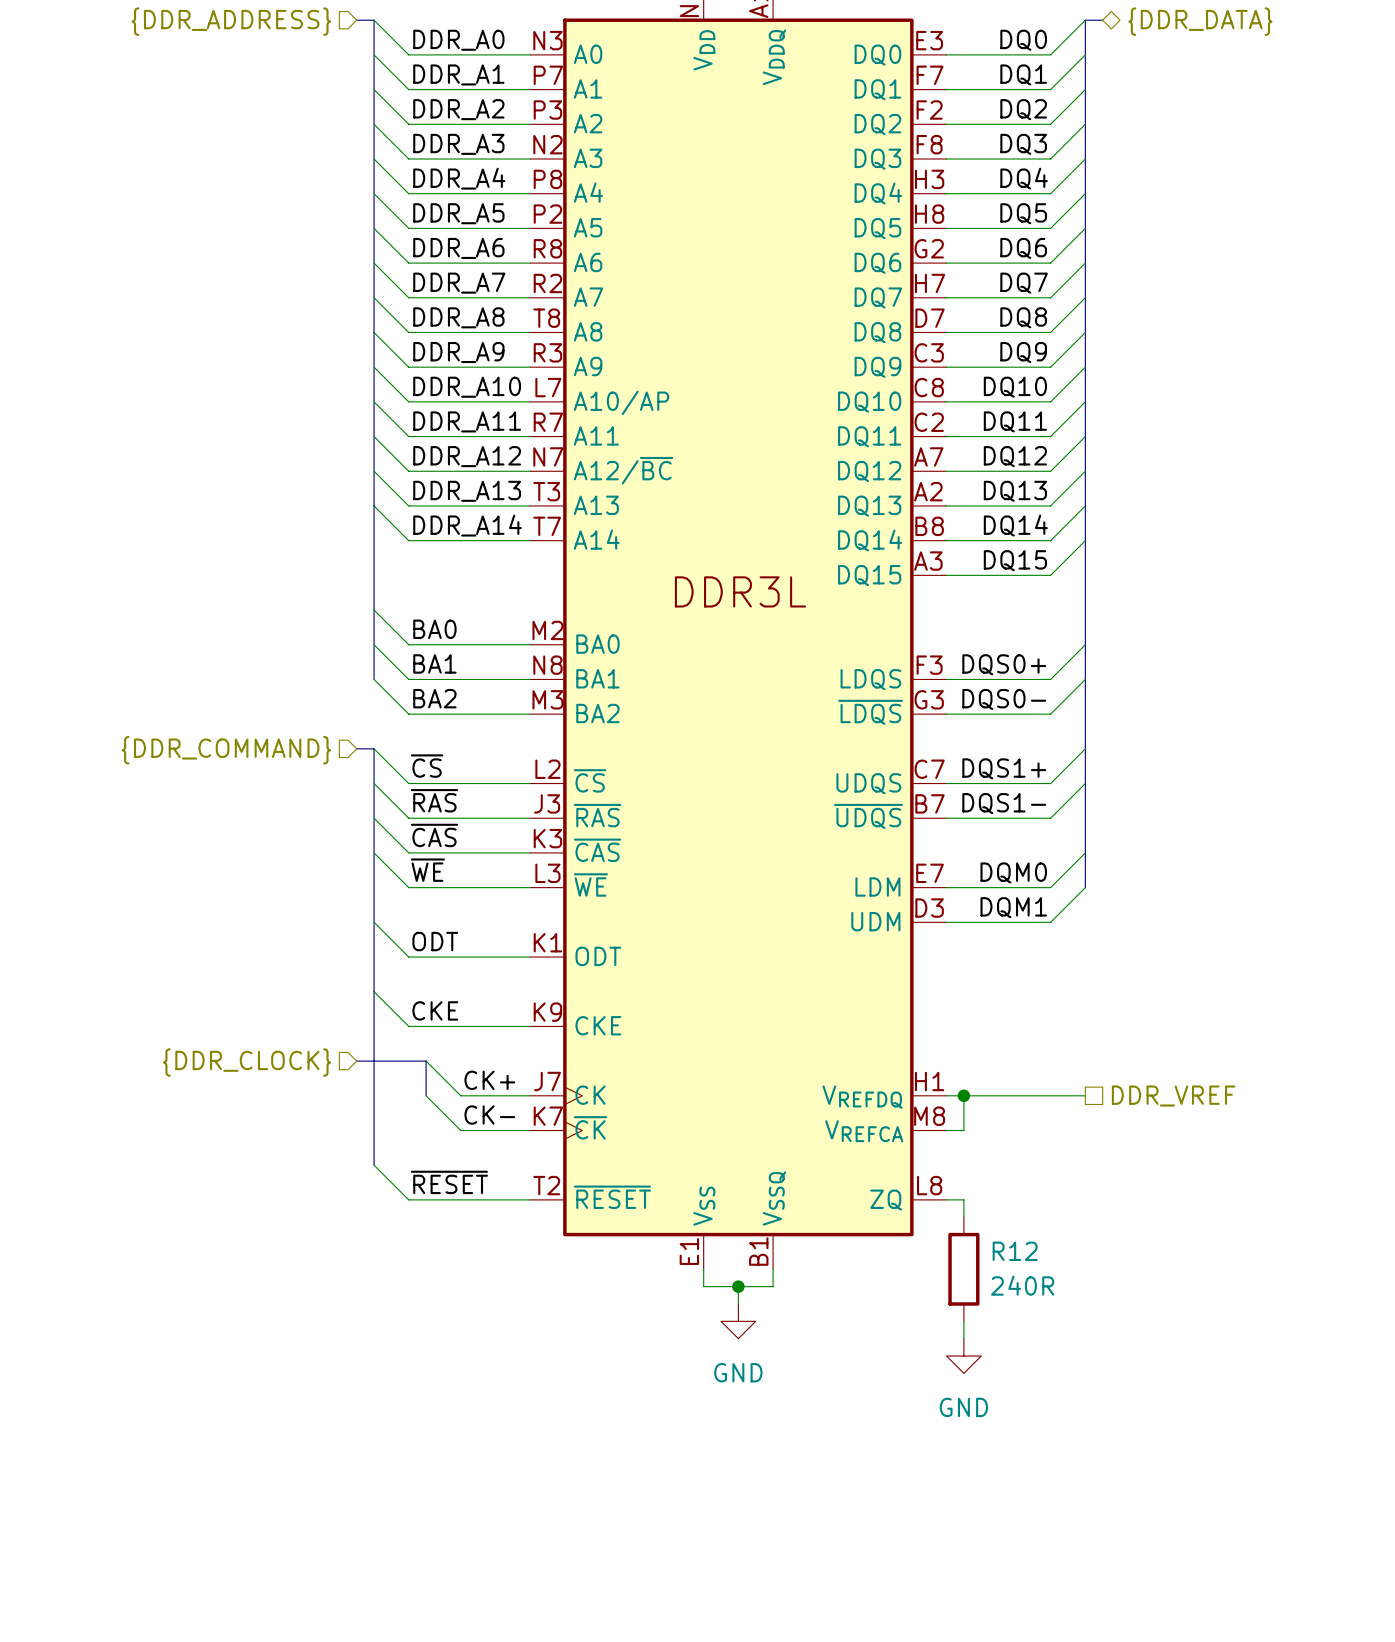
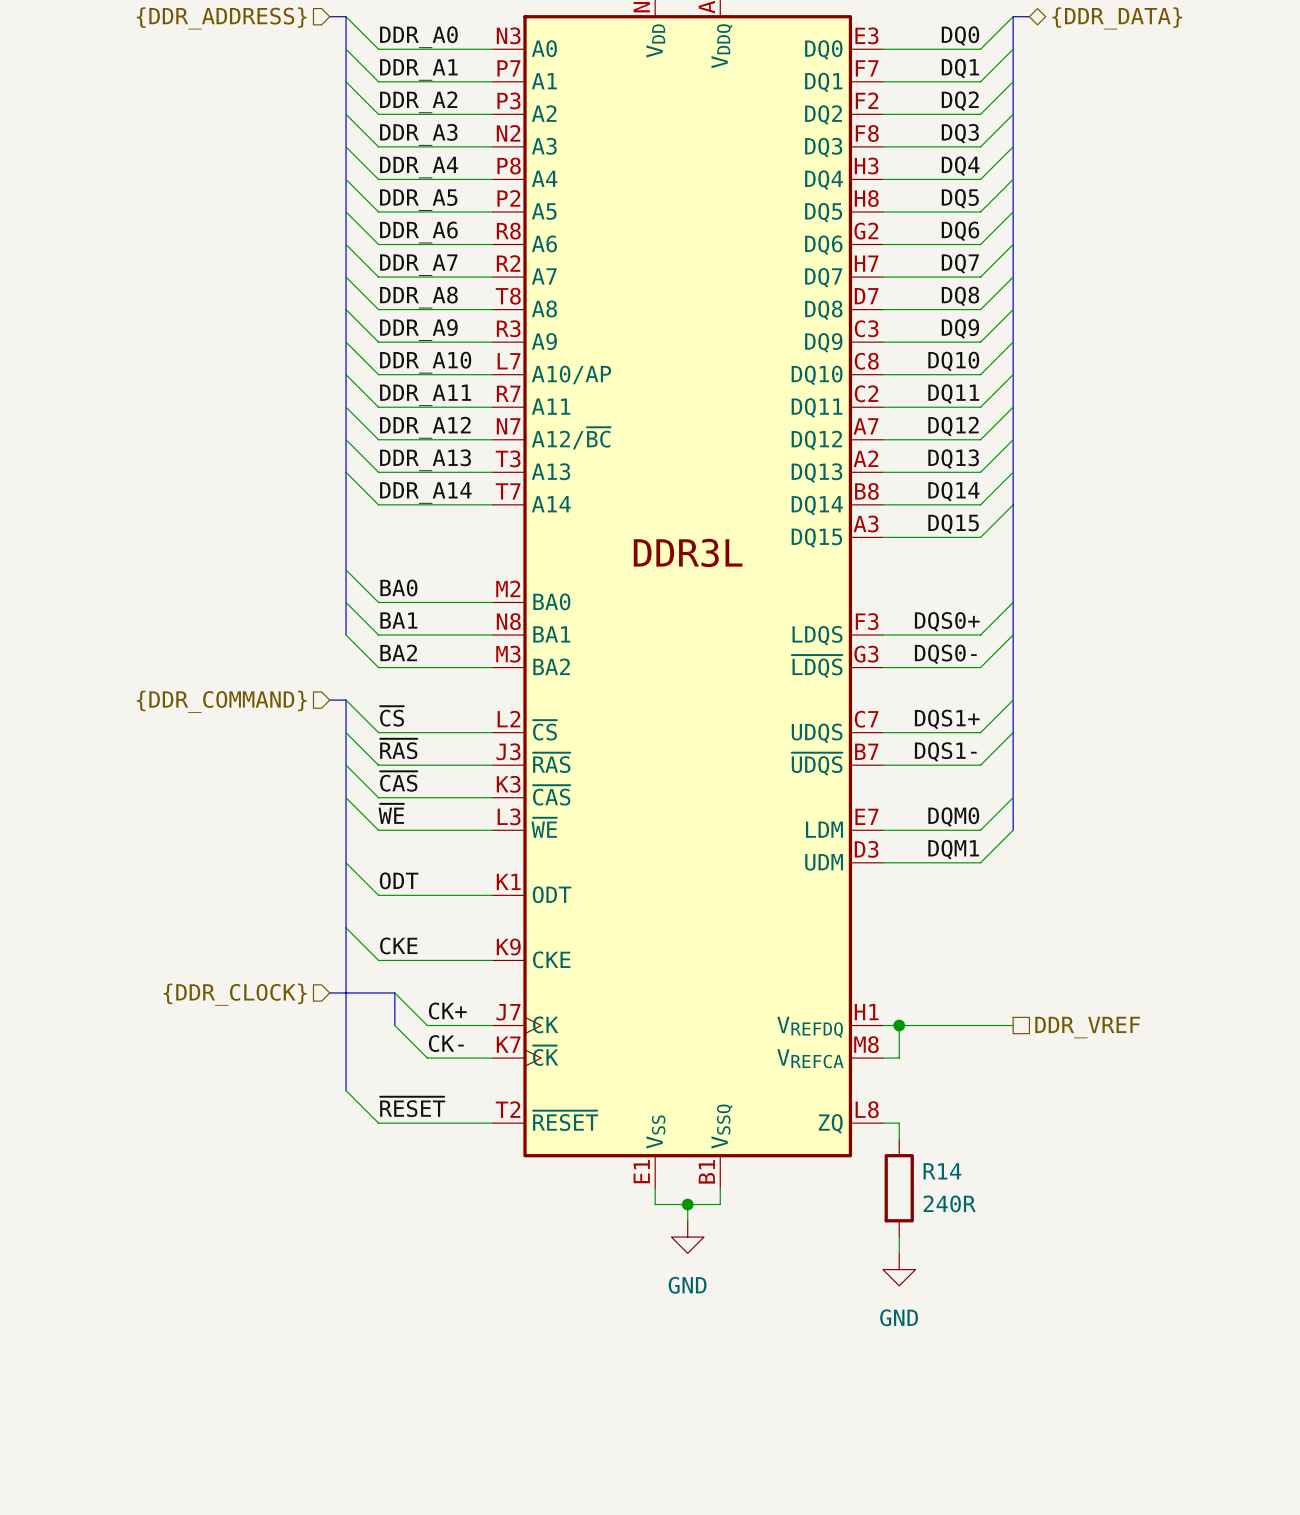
R12 name: R12 (1015, 1251) -> R14 (942, 1171)

